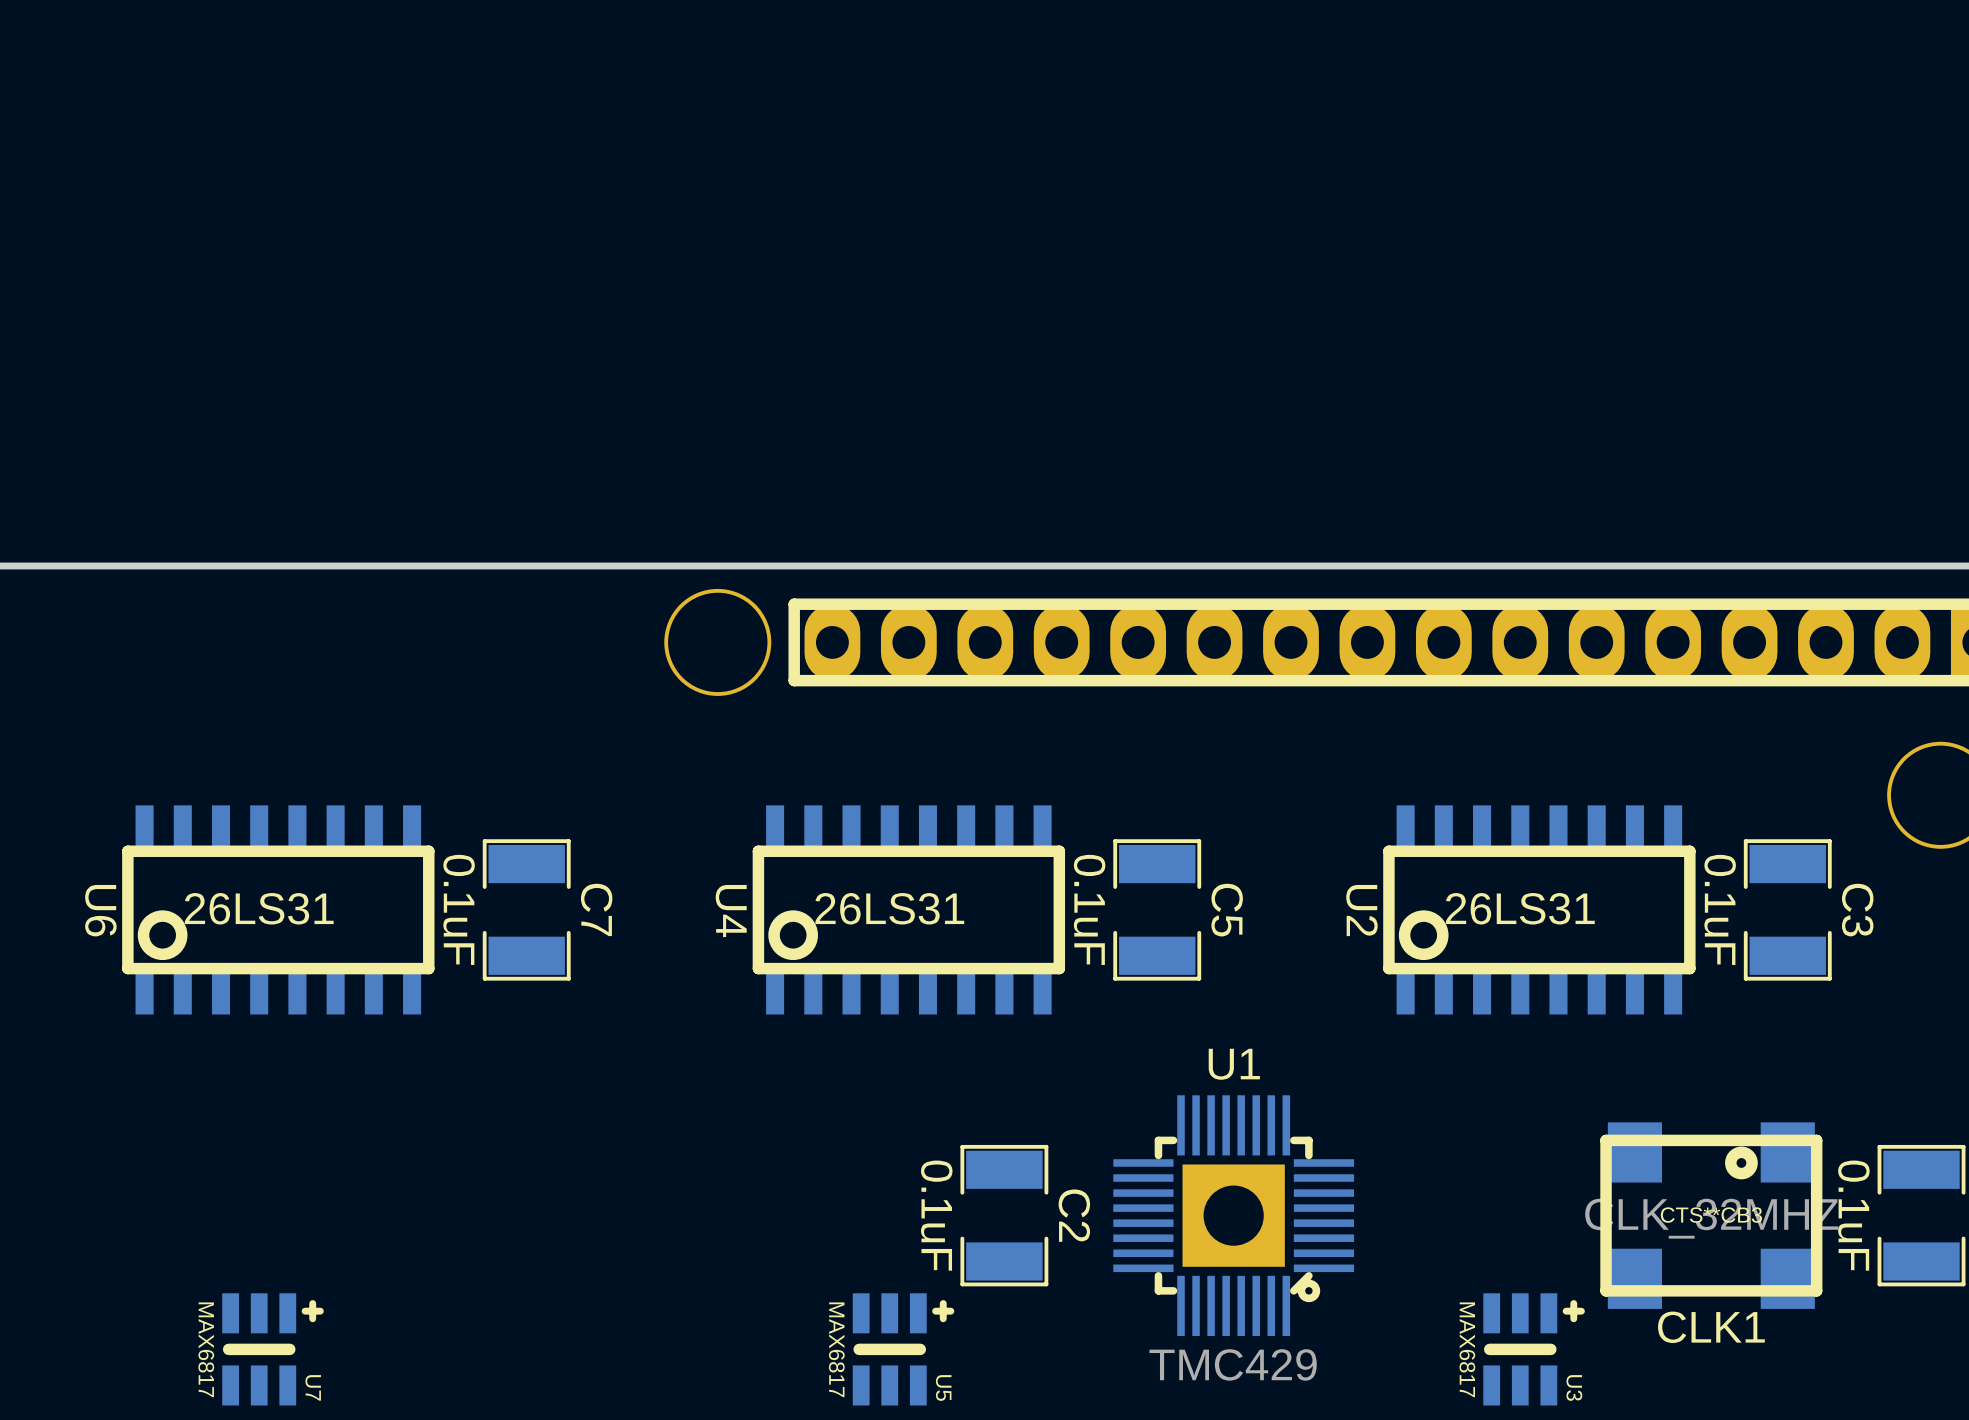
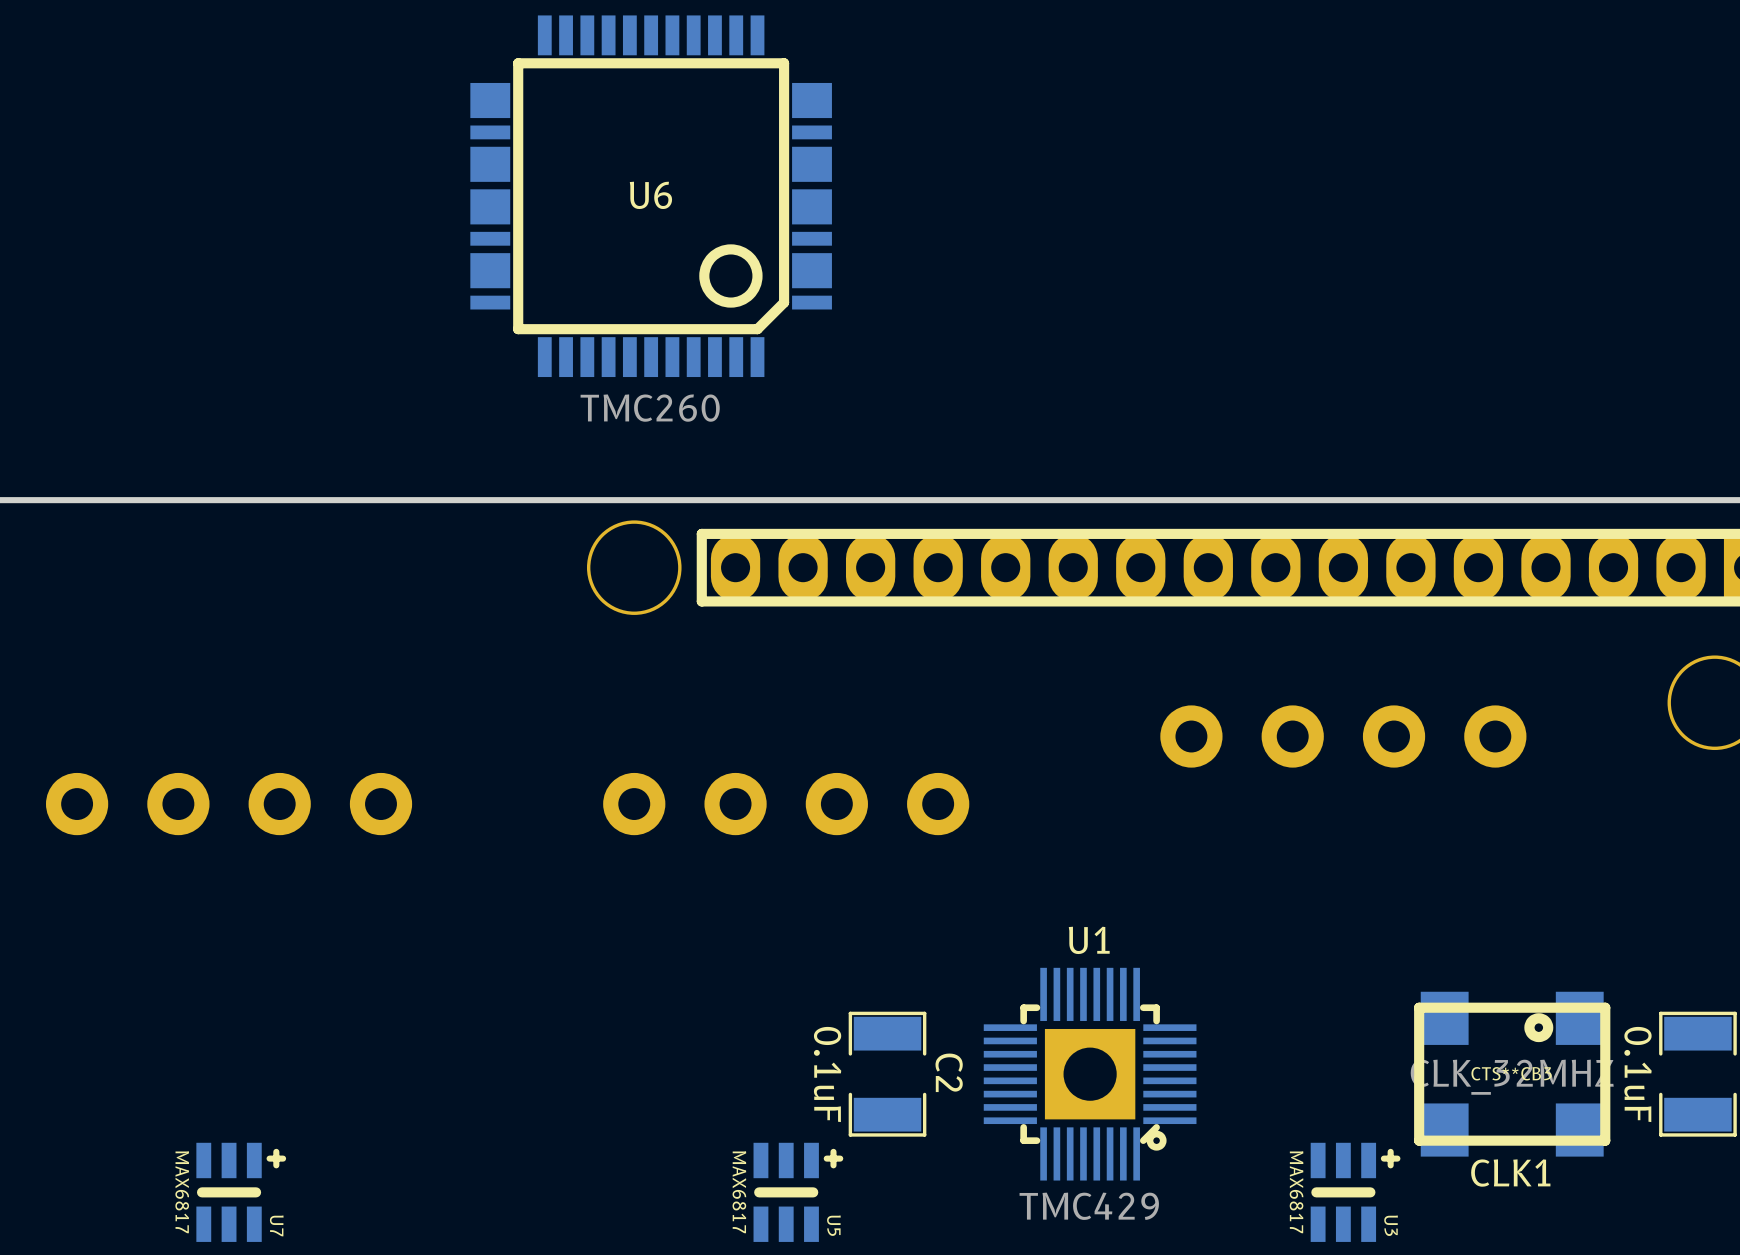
U6 footprint: [122, 805, 435, 1015] -> [470, 15, 832, 378]
part: none -> (1343, 736)
U6 value: 26LS31 (259, 908) -> TMC260 (650, 408)
part: none -> (229, 804)
C7: 0.1uF (526, 909) -> none
part: none -> (786, 804)
U4: 26LS31 (908, 909) -> none
C5: 0.1uF (1157, 909) -> none
U2: 26LS31 (1539, 909) -> none
C3: 0.1uF (1787, 909) -> none
U6 name position: U6 (100, 910) -> U6 (650, 195)

